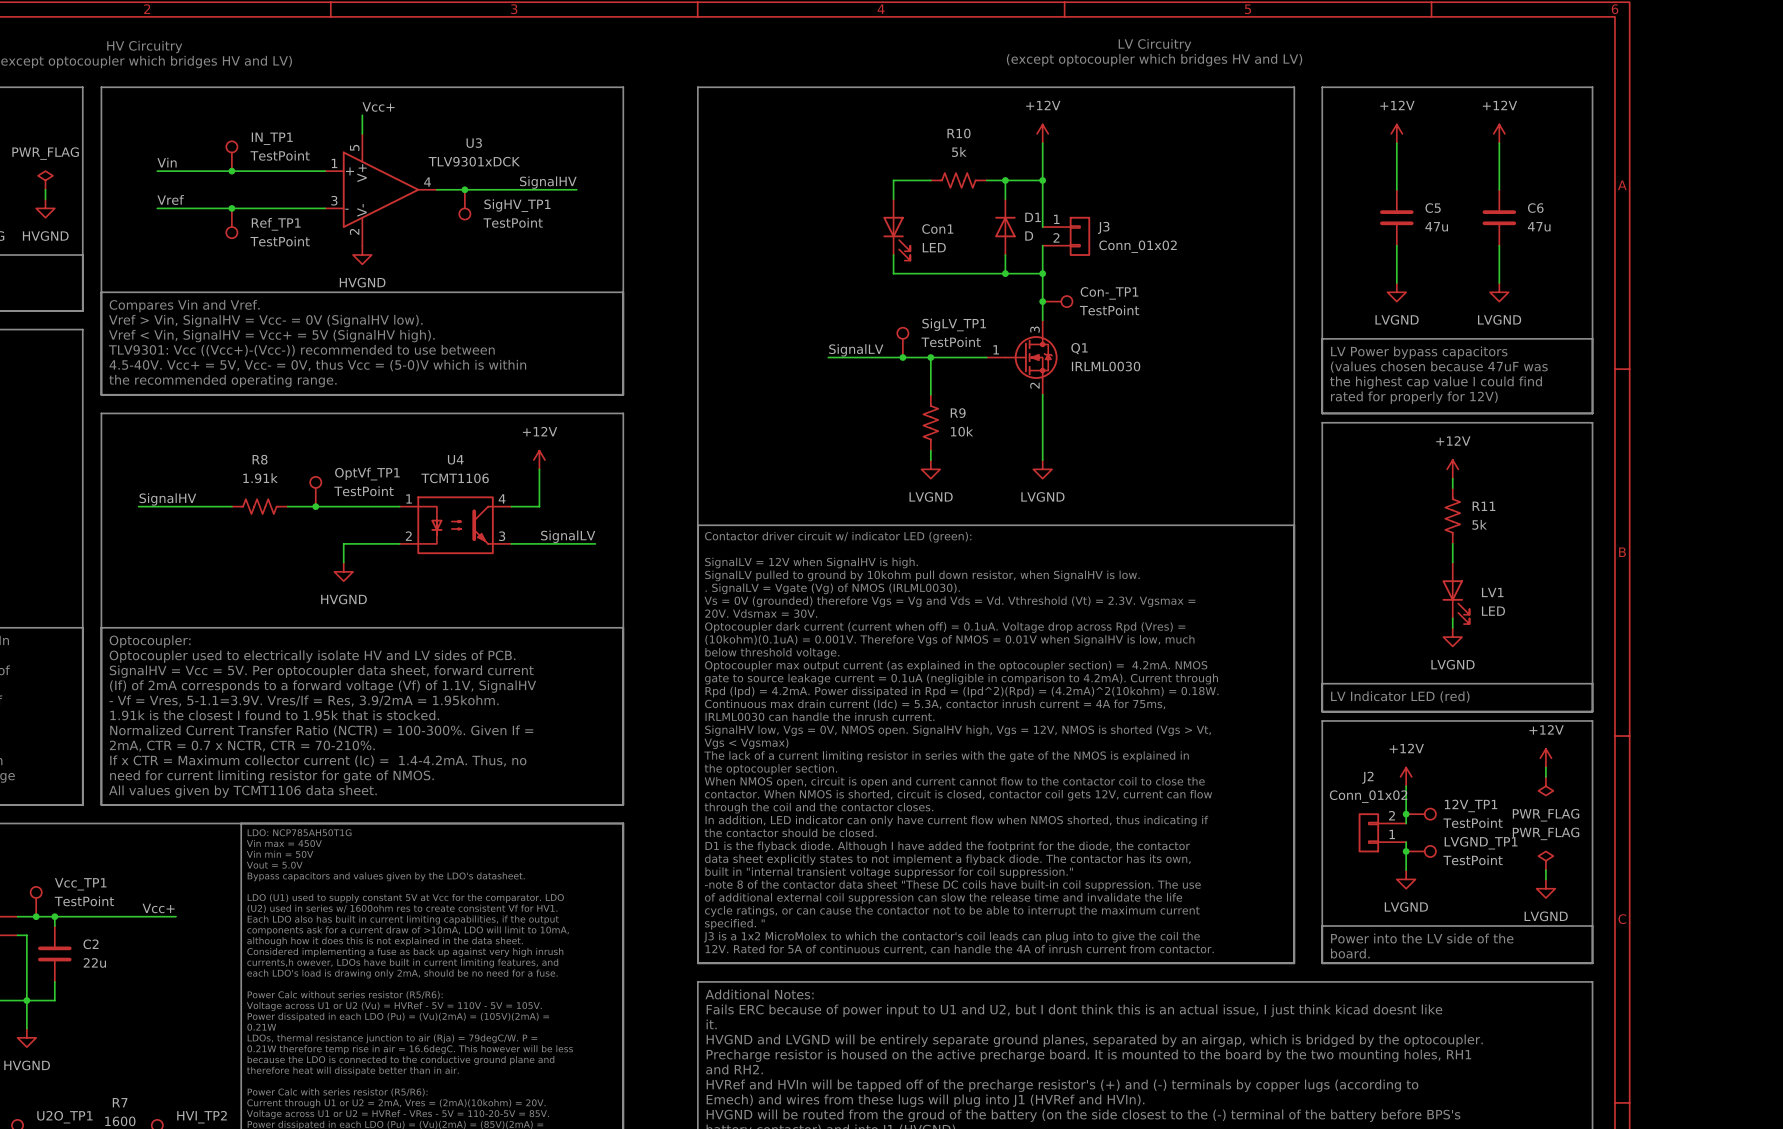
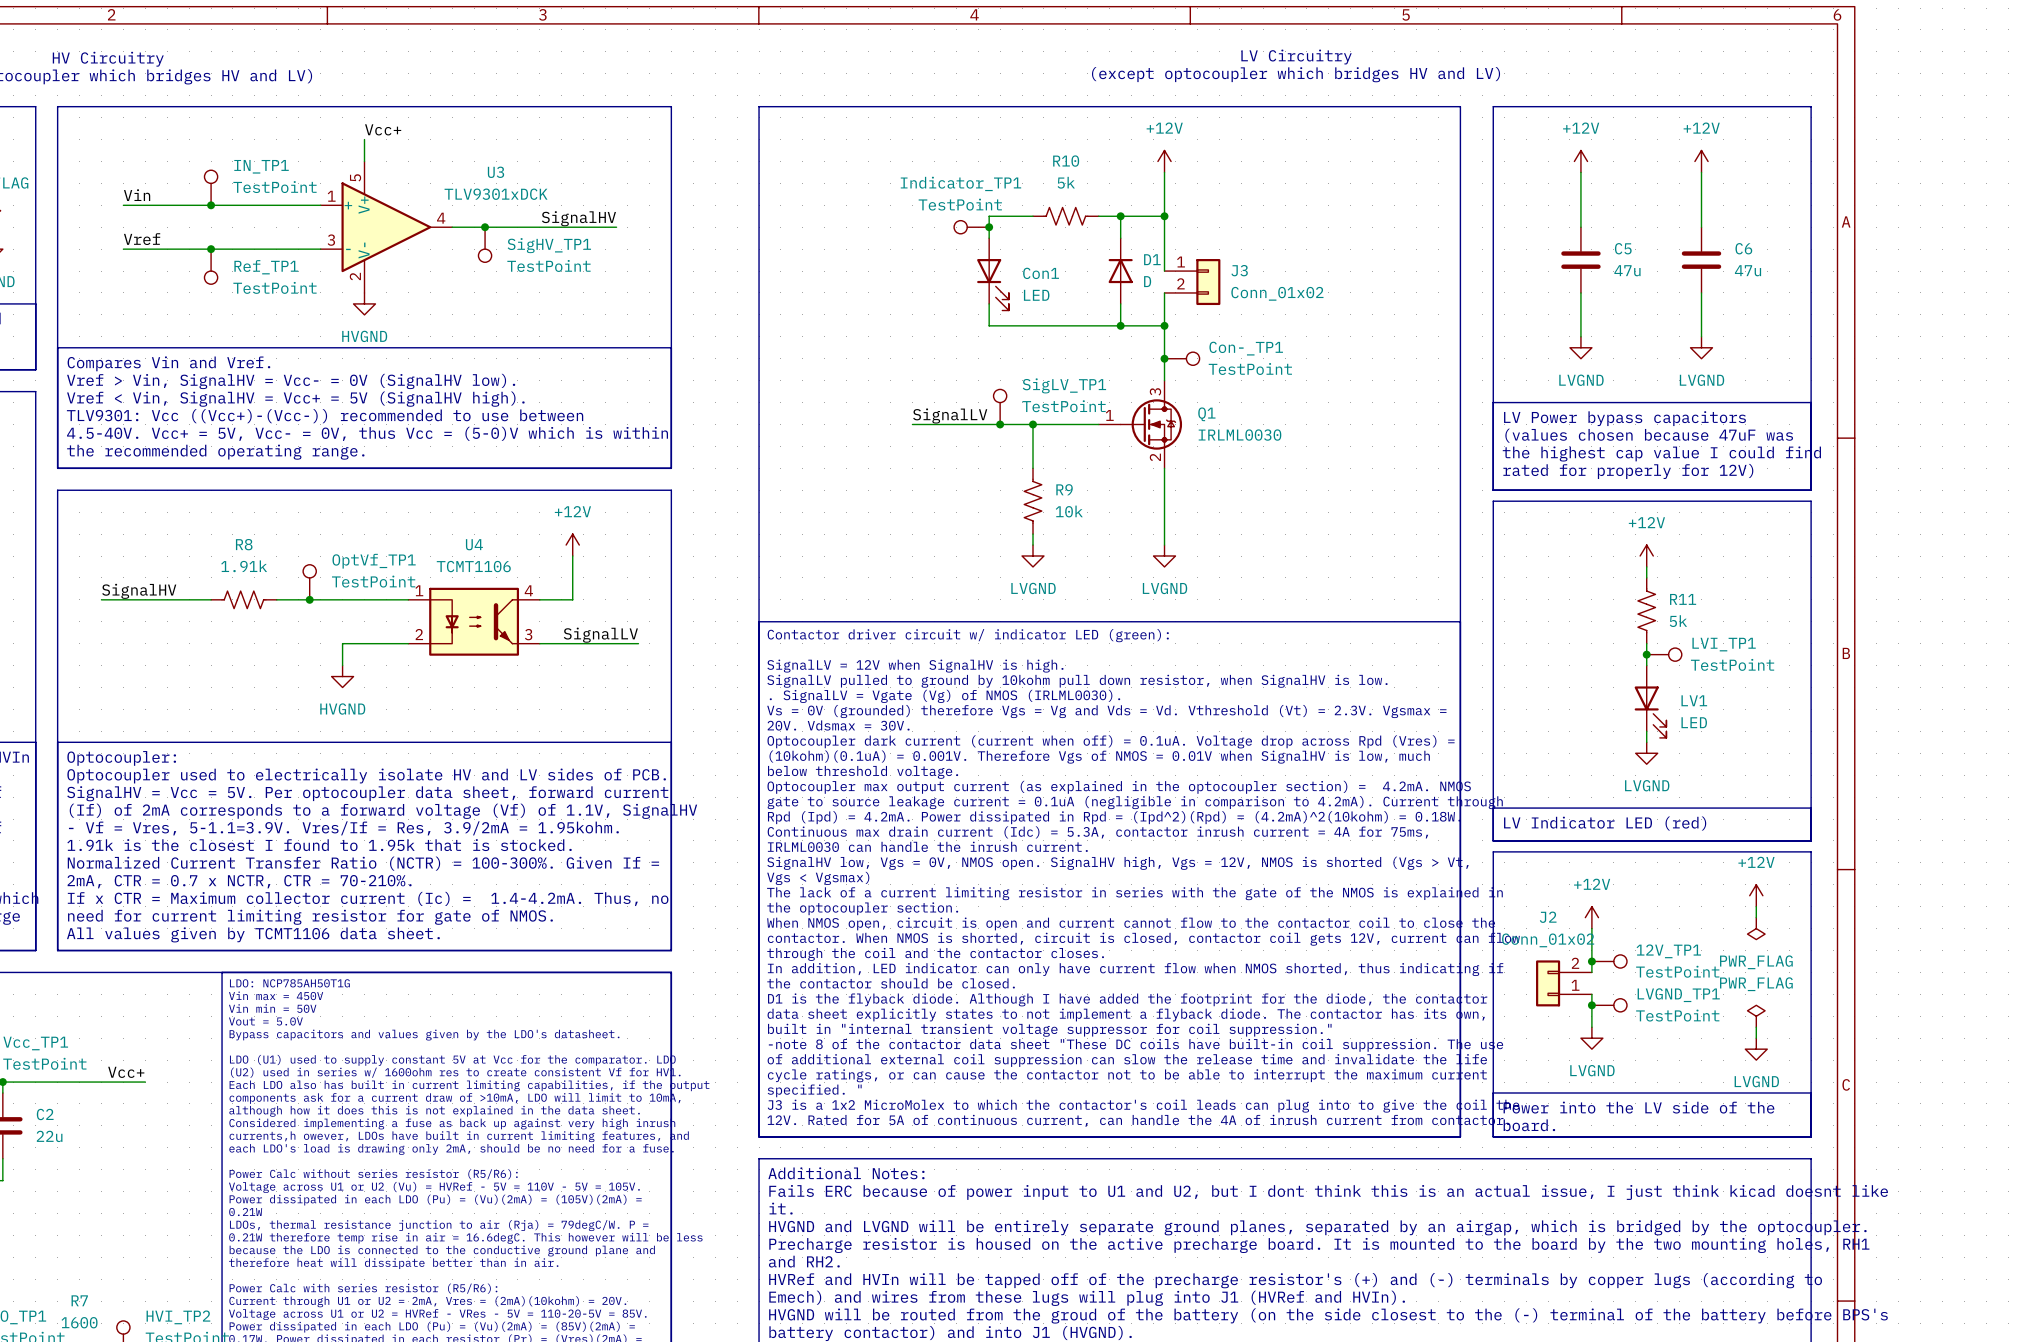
Indicator_TP1: none -> TestPoint (971, 227)
junction: none -> (989, 227)
junction: none -> (1646, 654)
LVI_TP1: none -> TestPoint (1664, 654)

